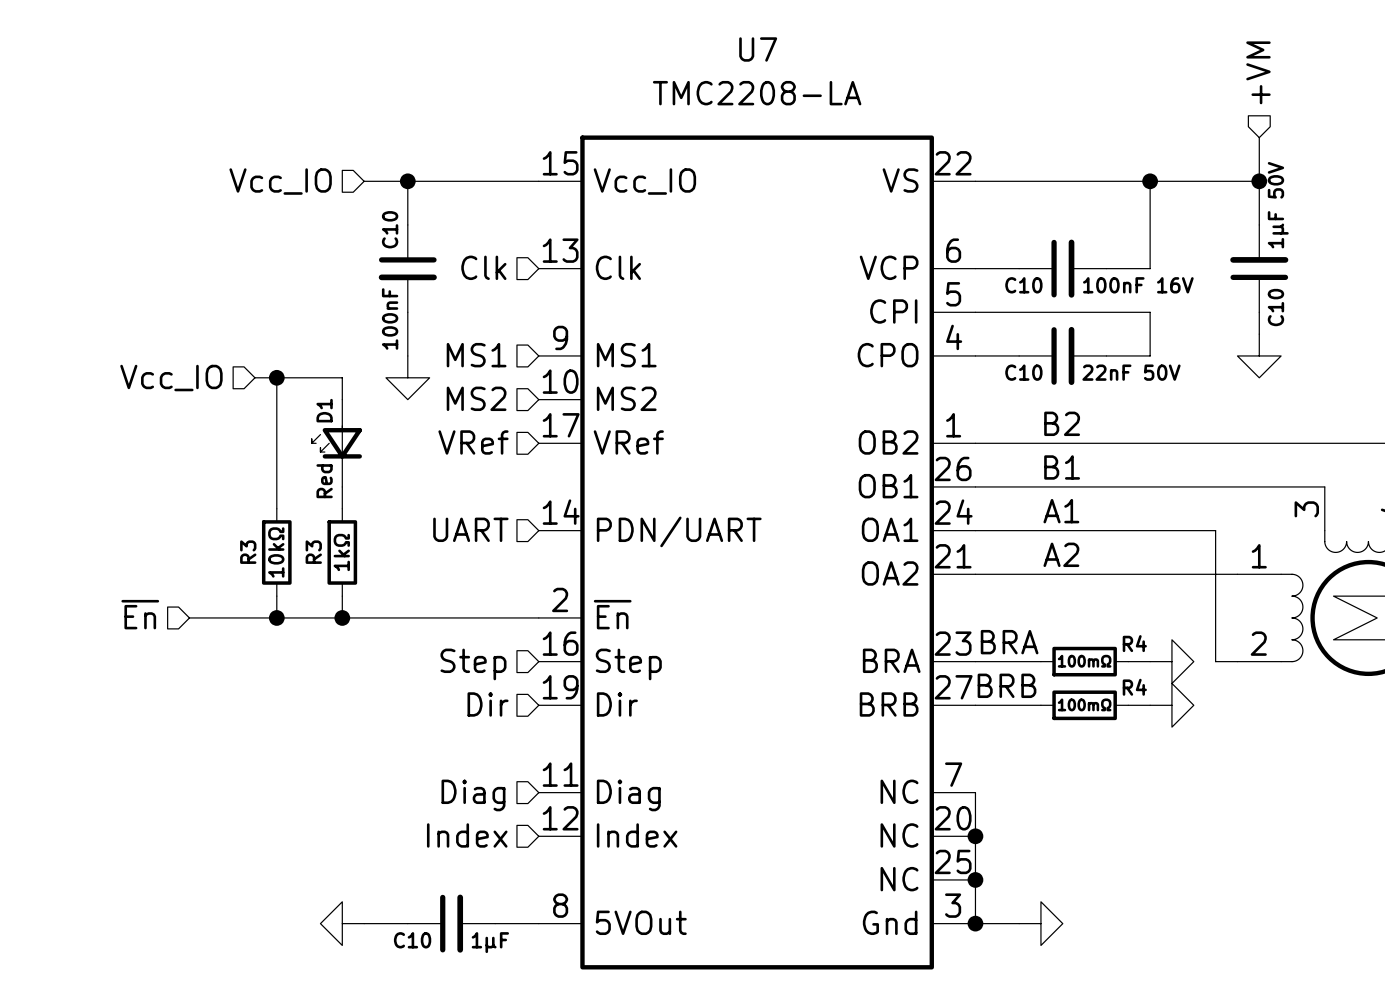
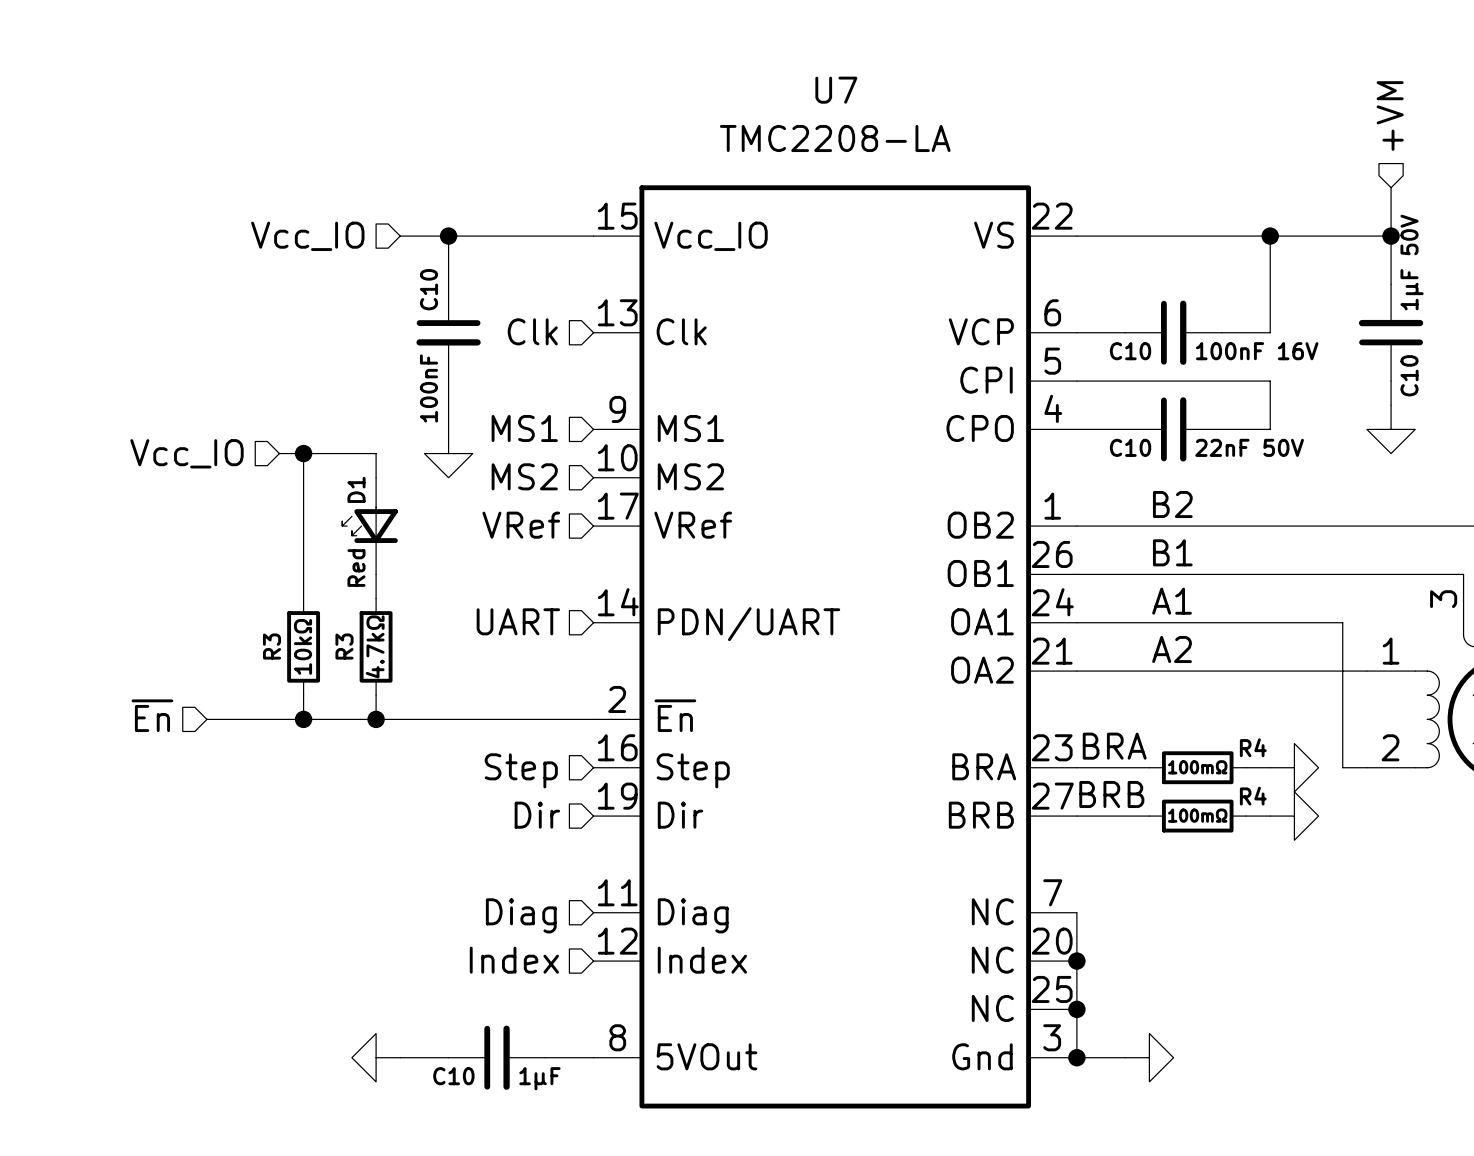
R3 value: 1kΩ (341, 552) -> 4.7kΩ (375, 646)

